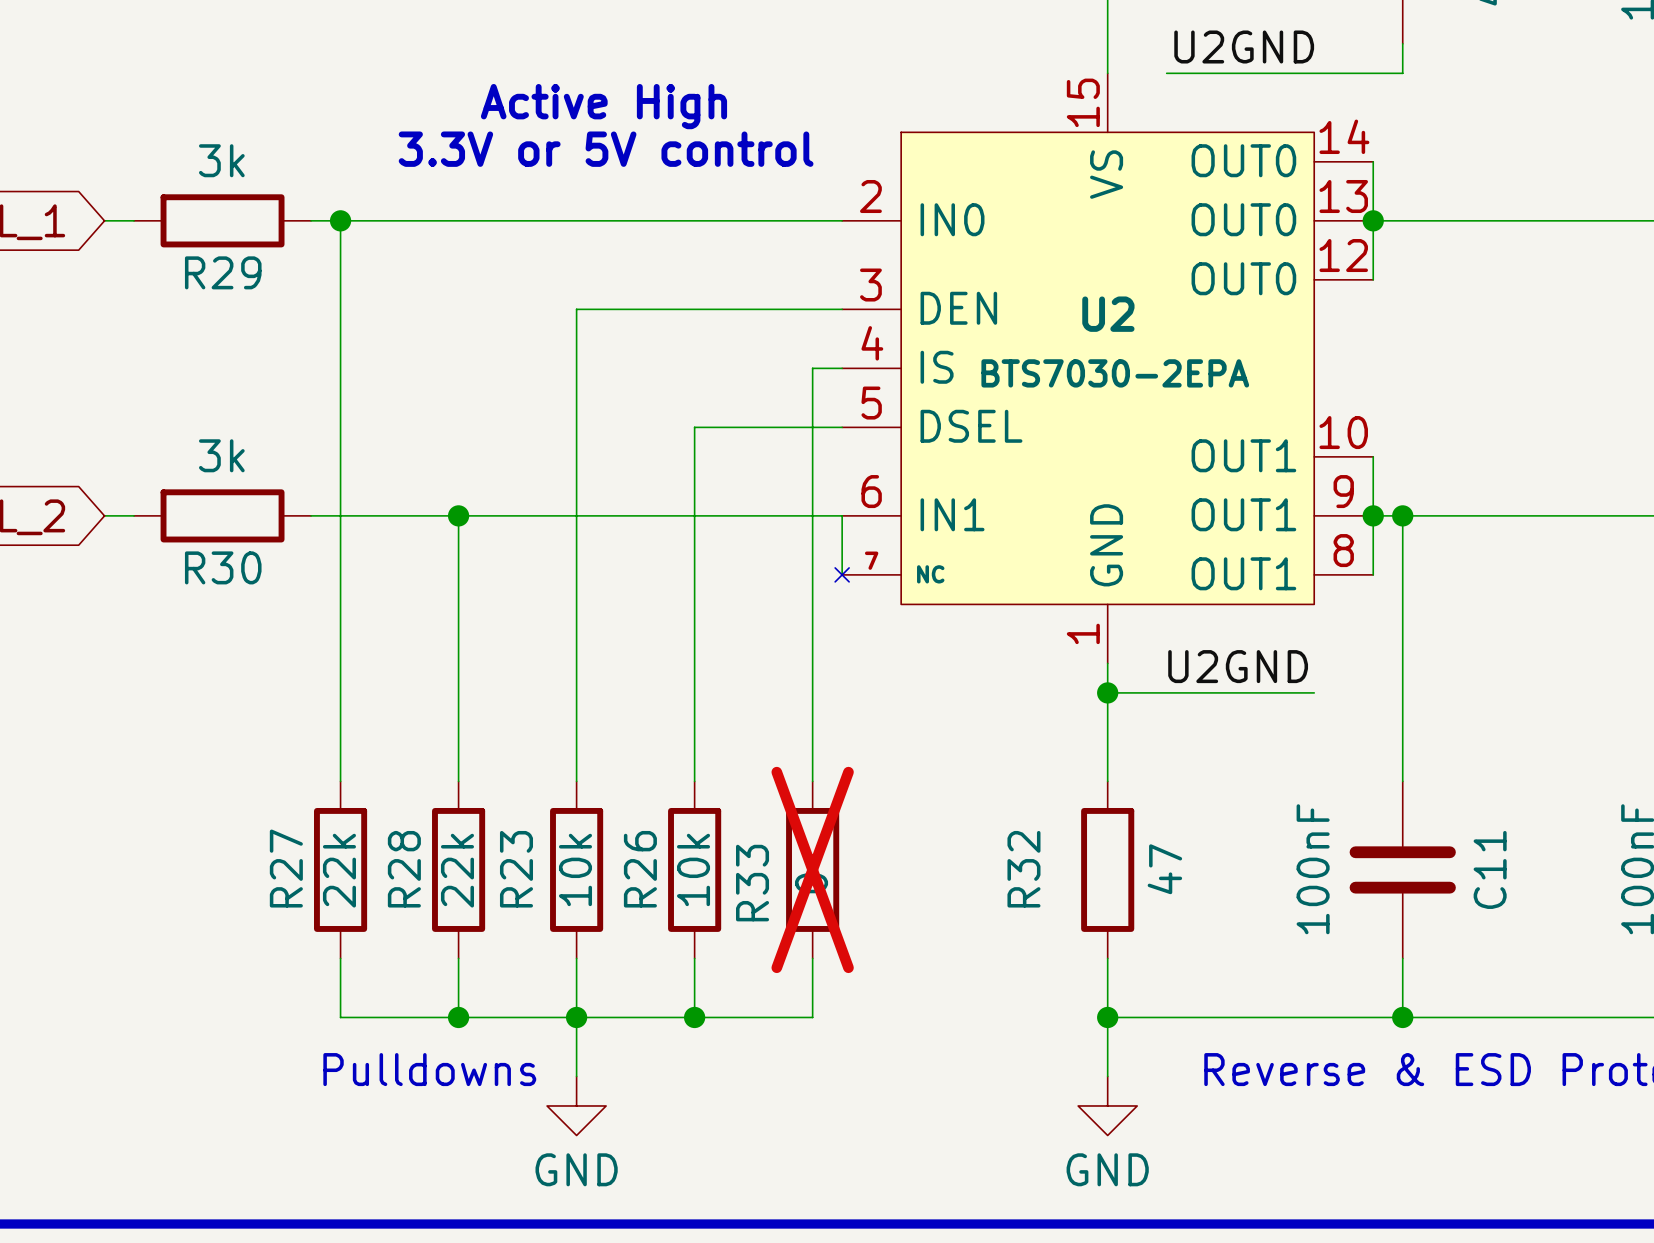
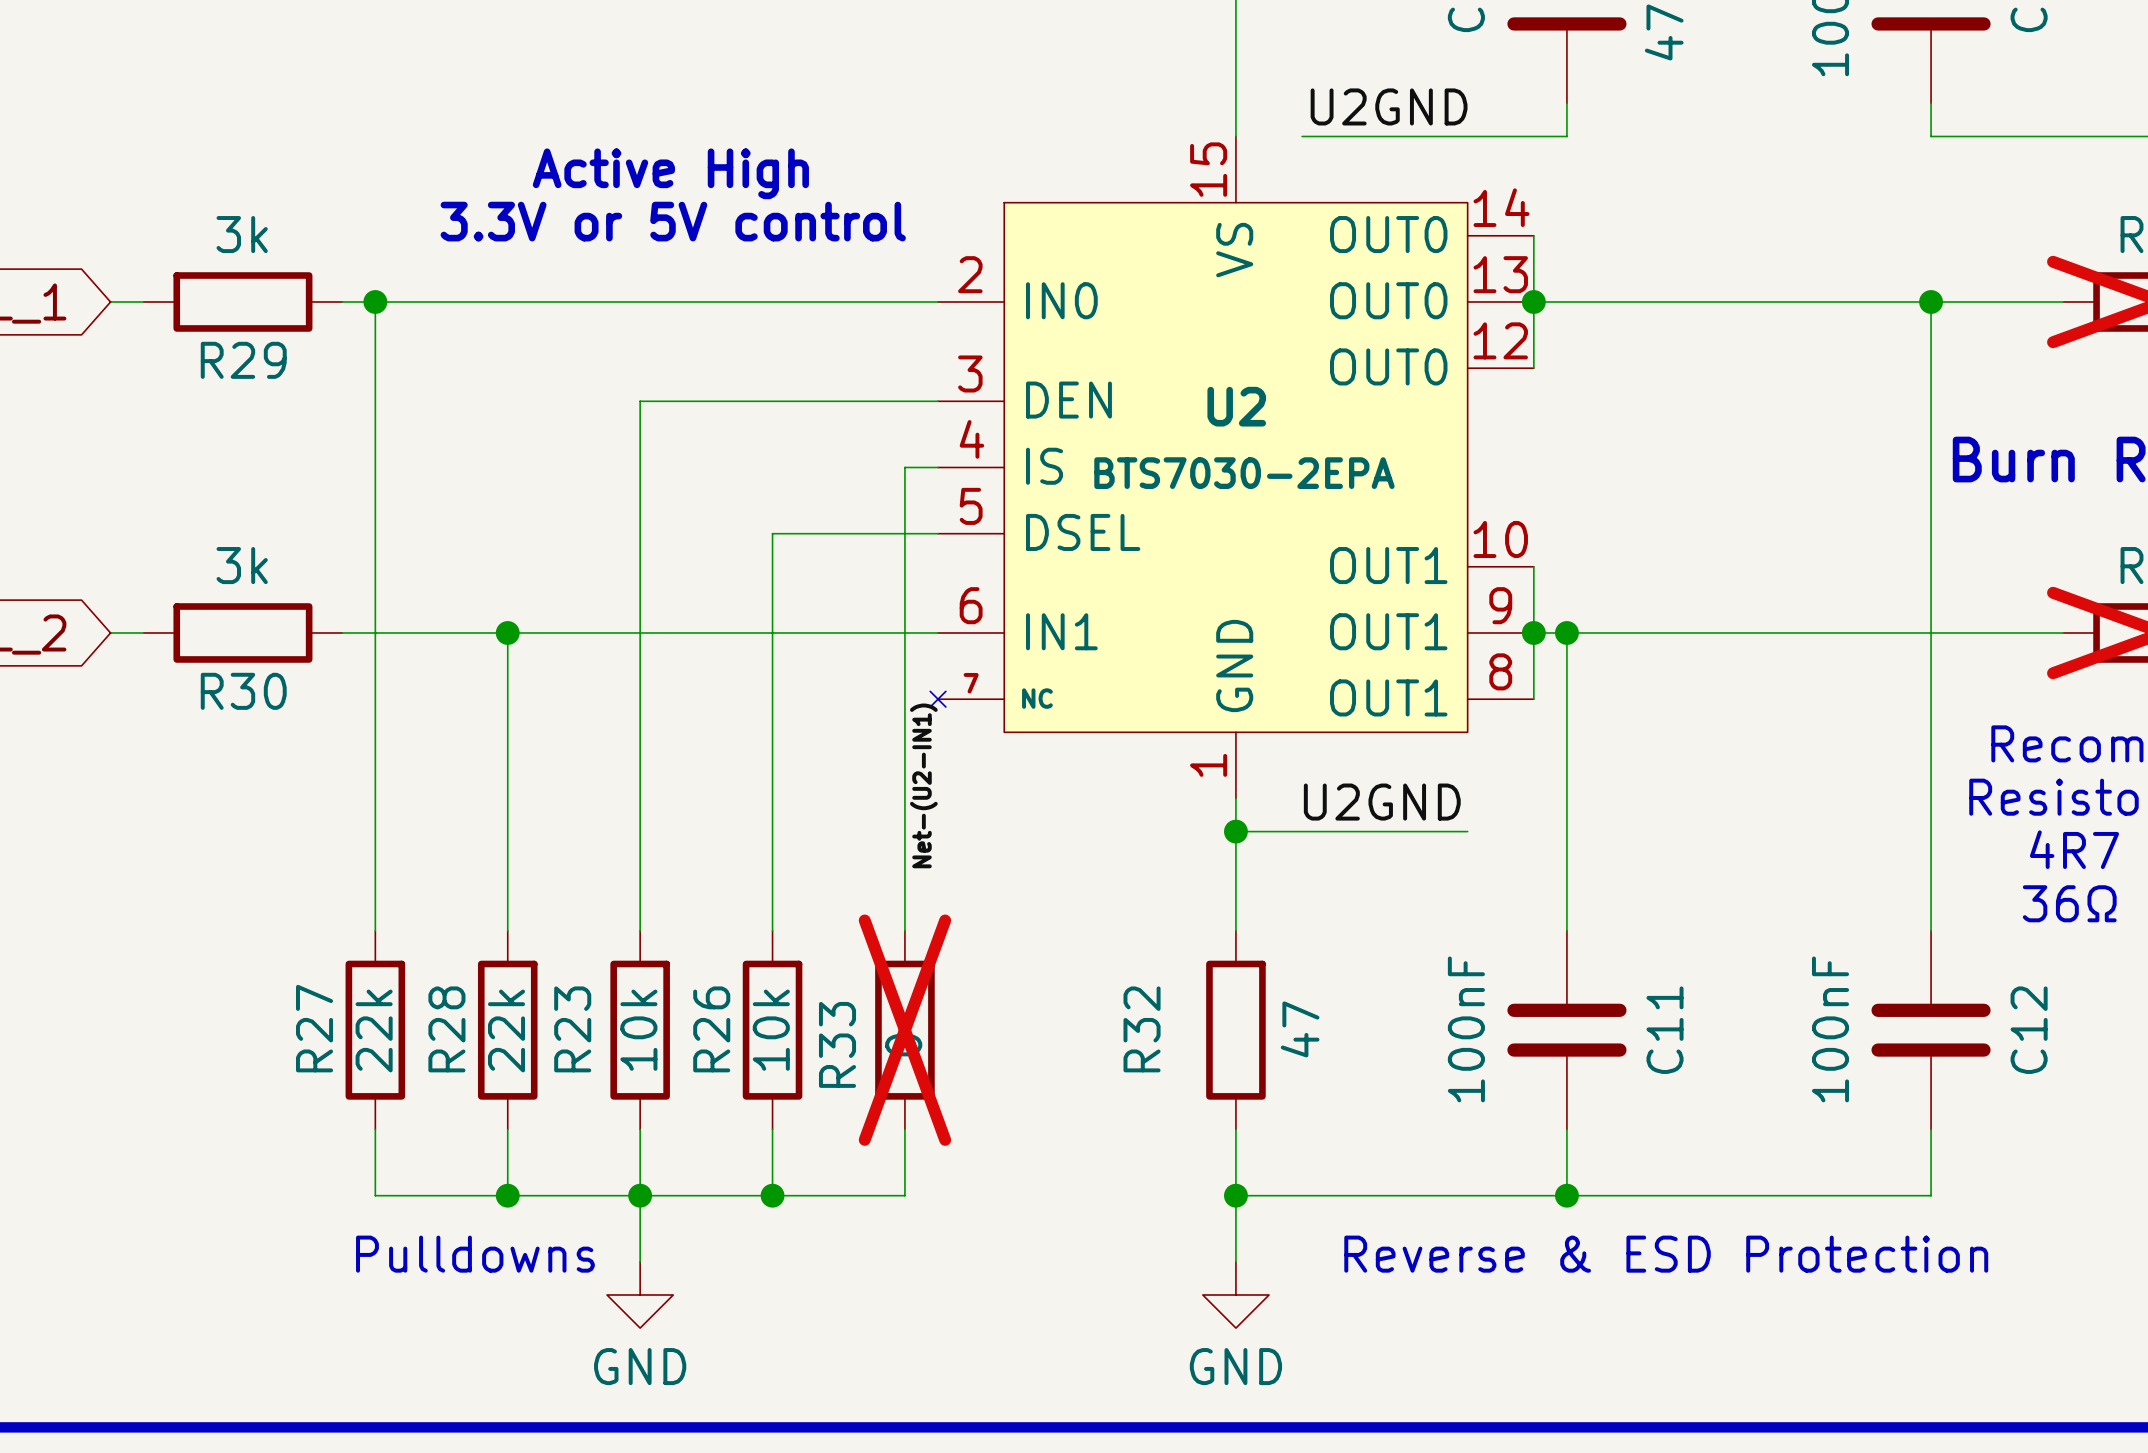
wire: (842, 515) (842, 574) -> none
label: none -> Net-(U2-IN1) (923, 785)

